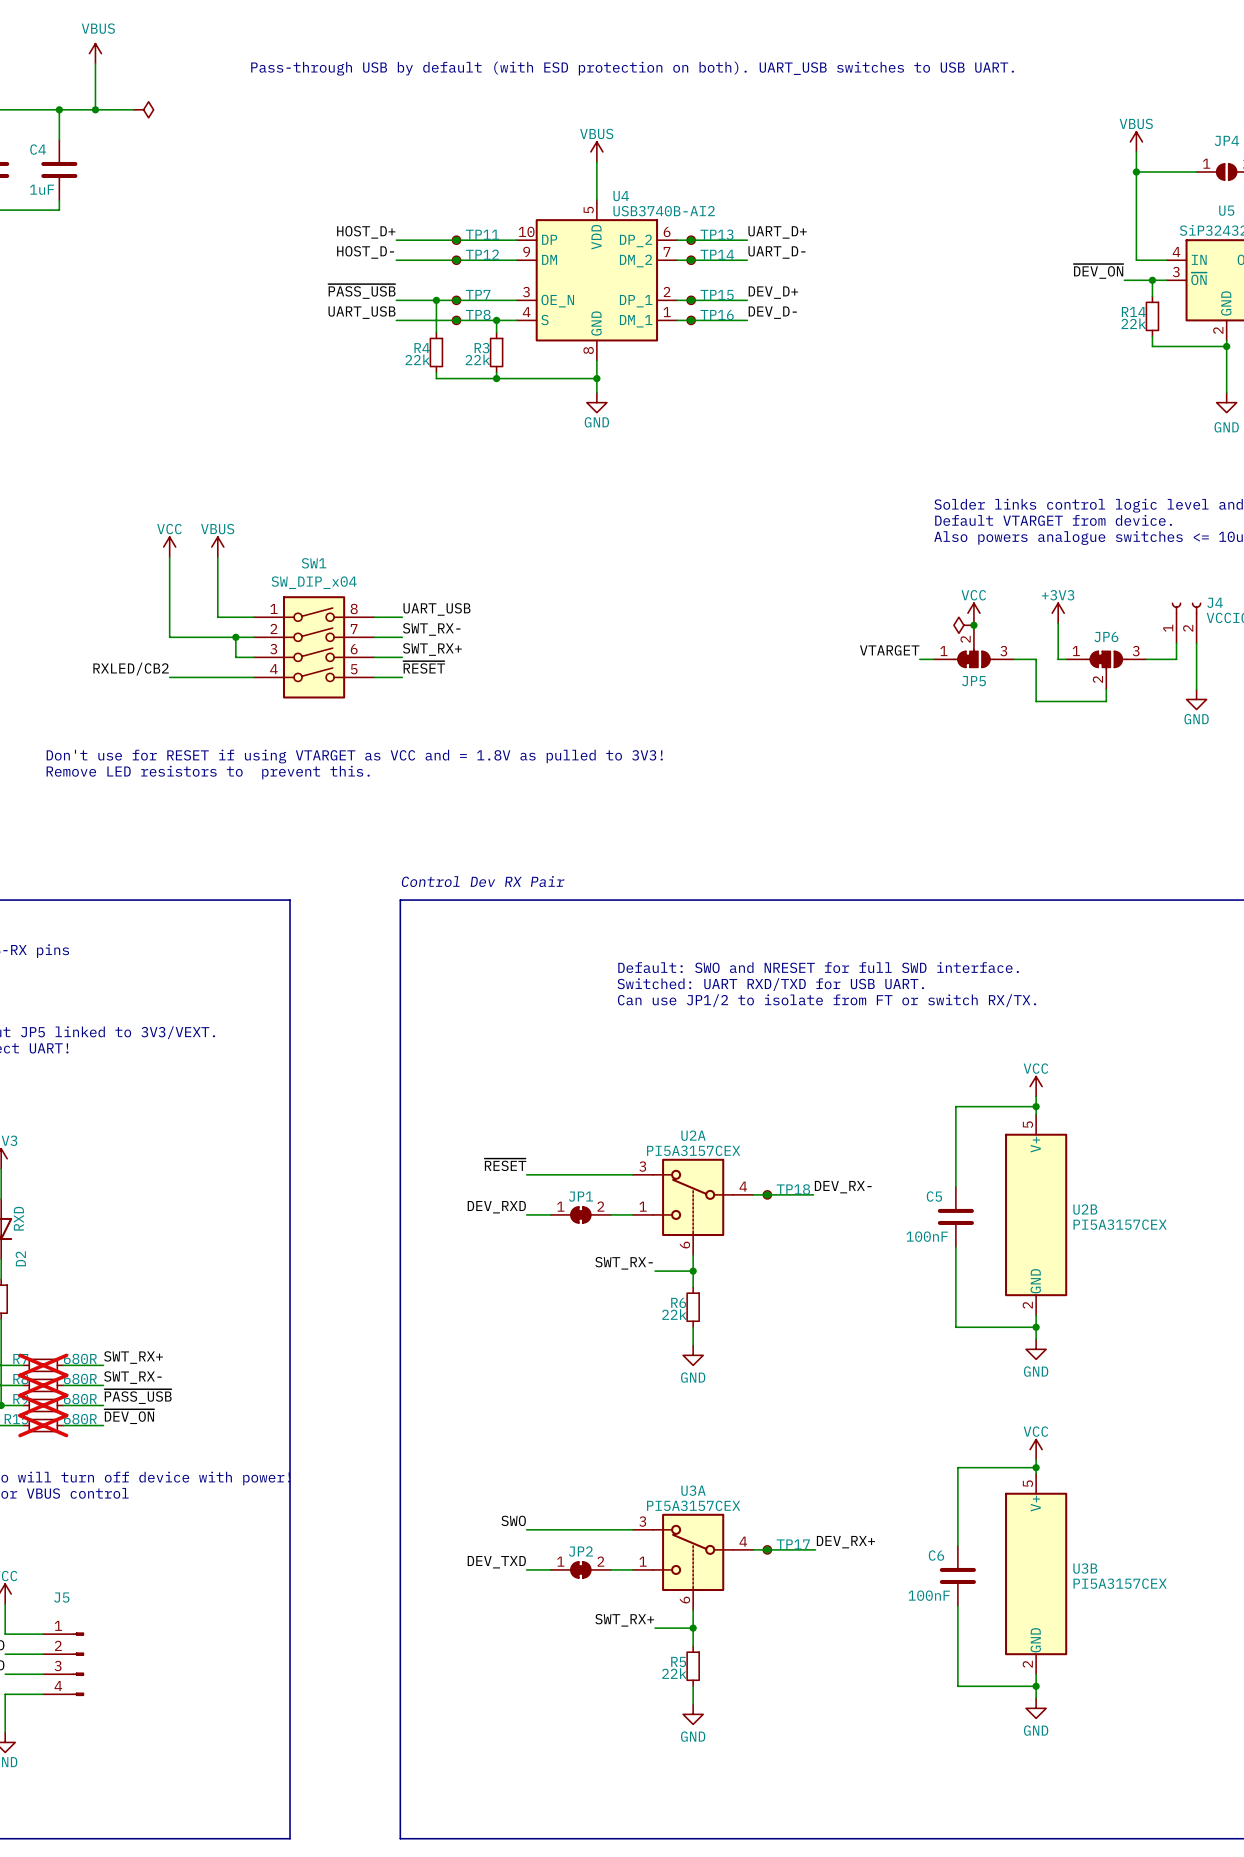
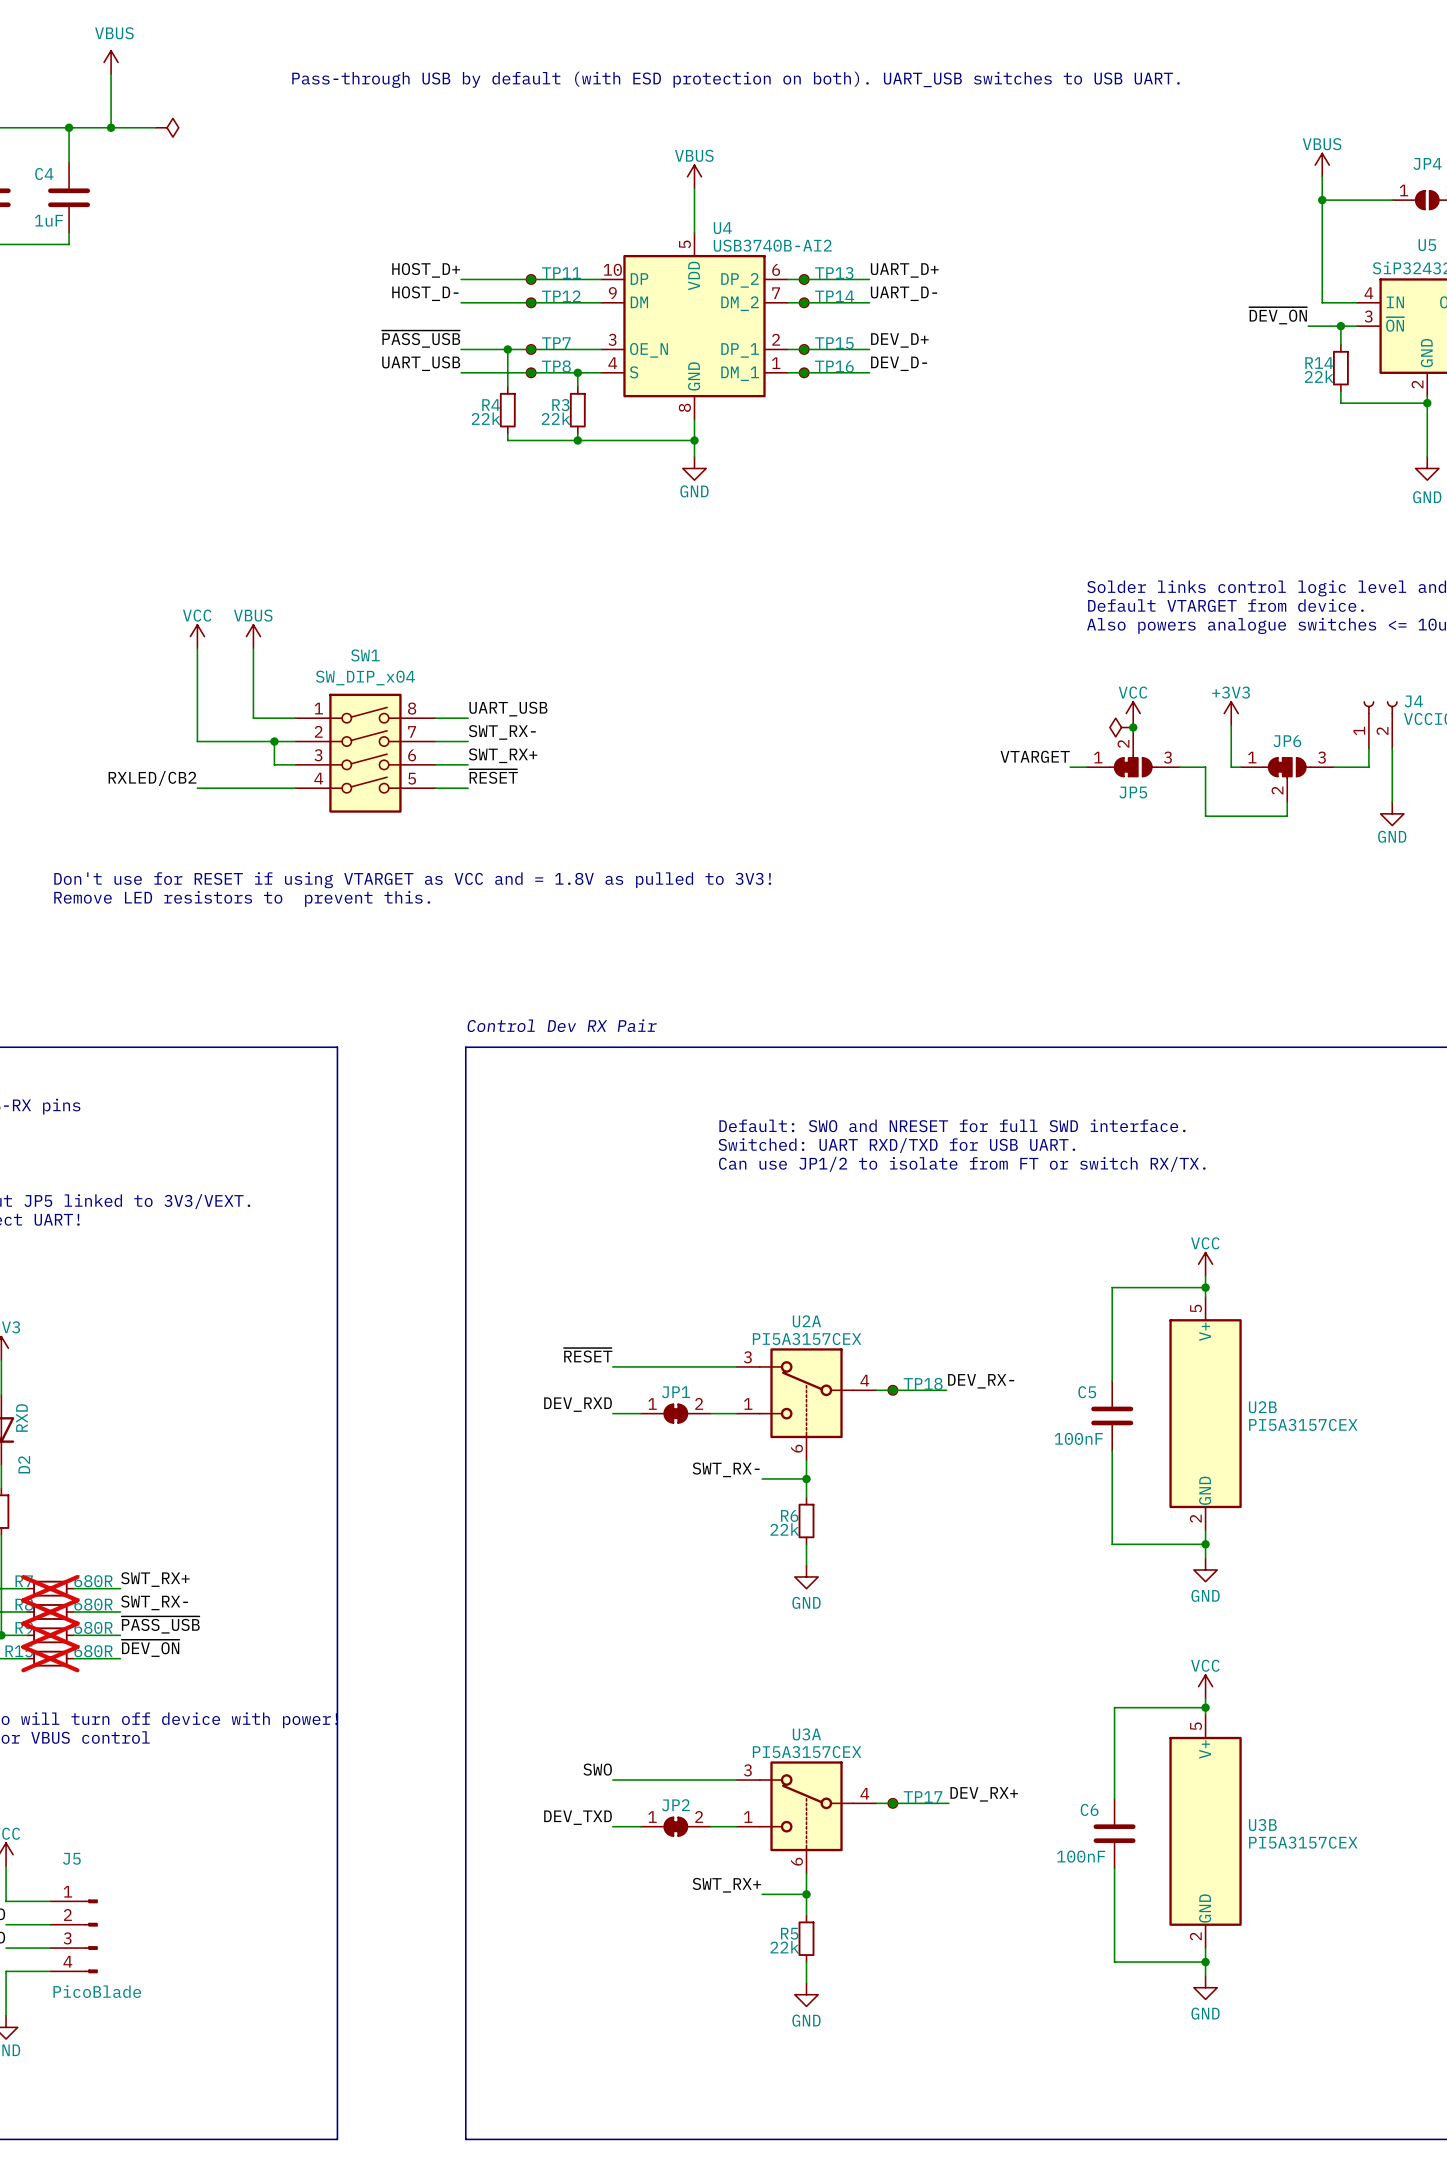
J5 value: none -> PicoBlade (97, 1991)

